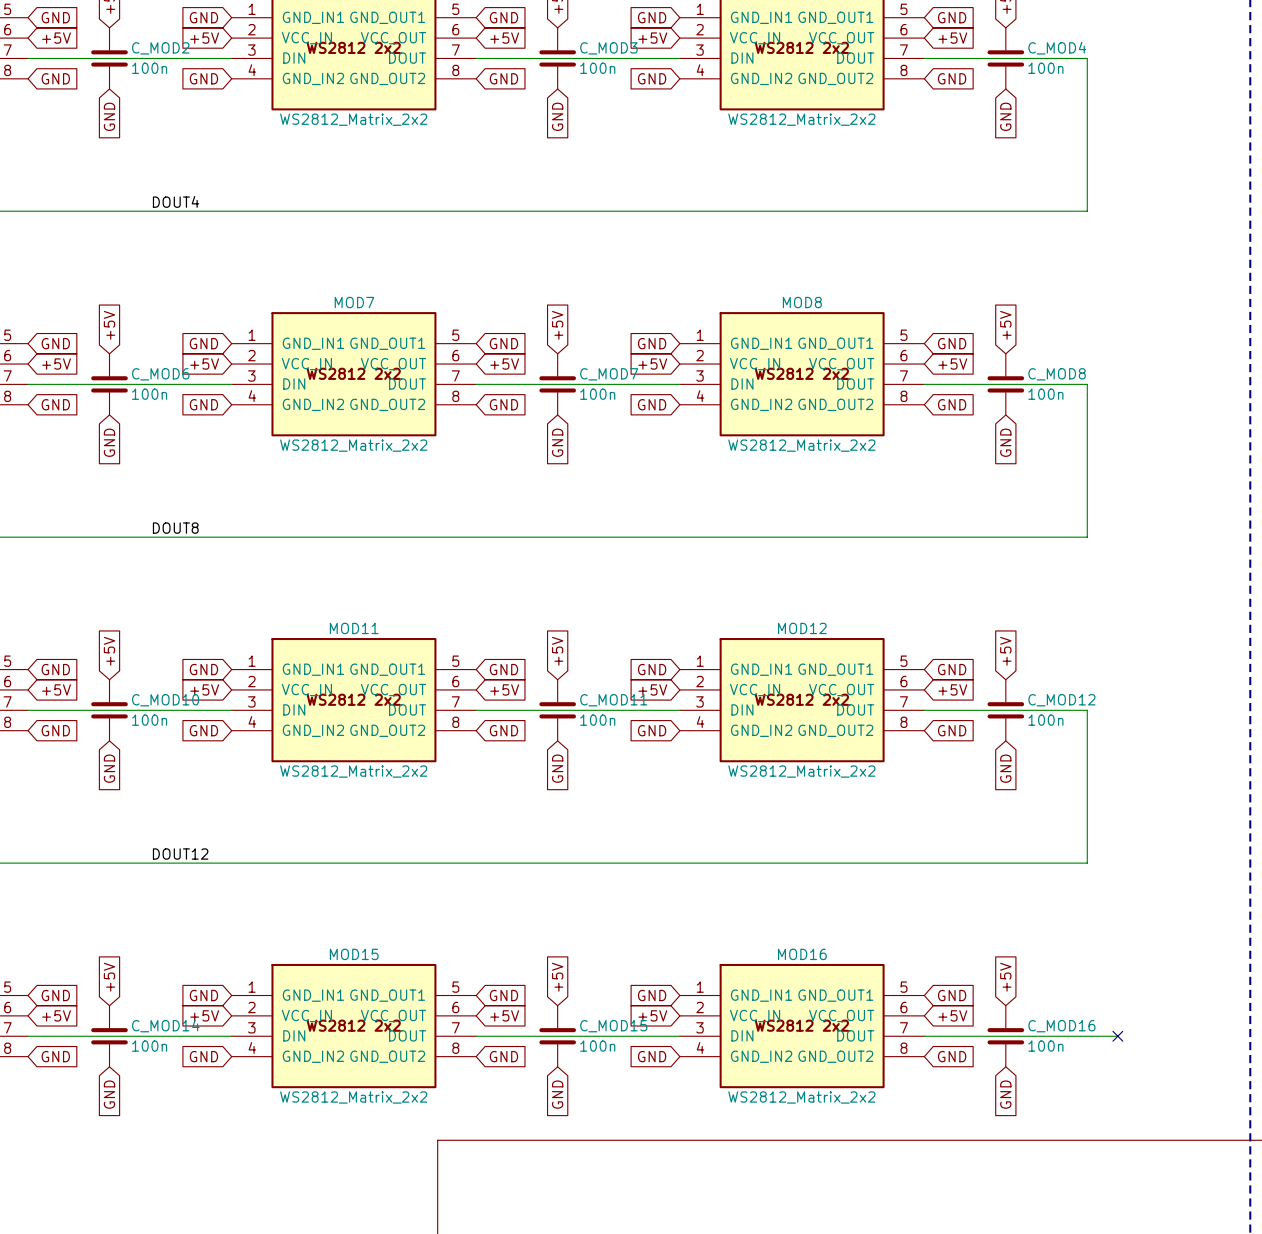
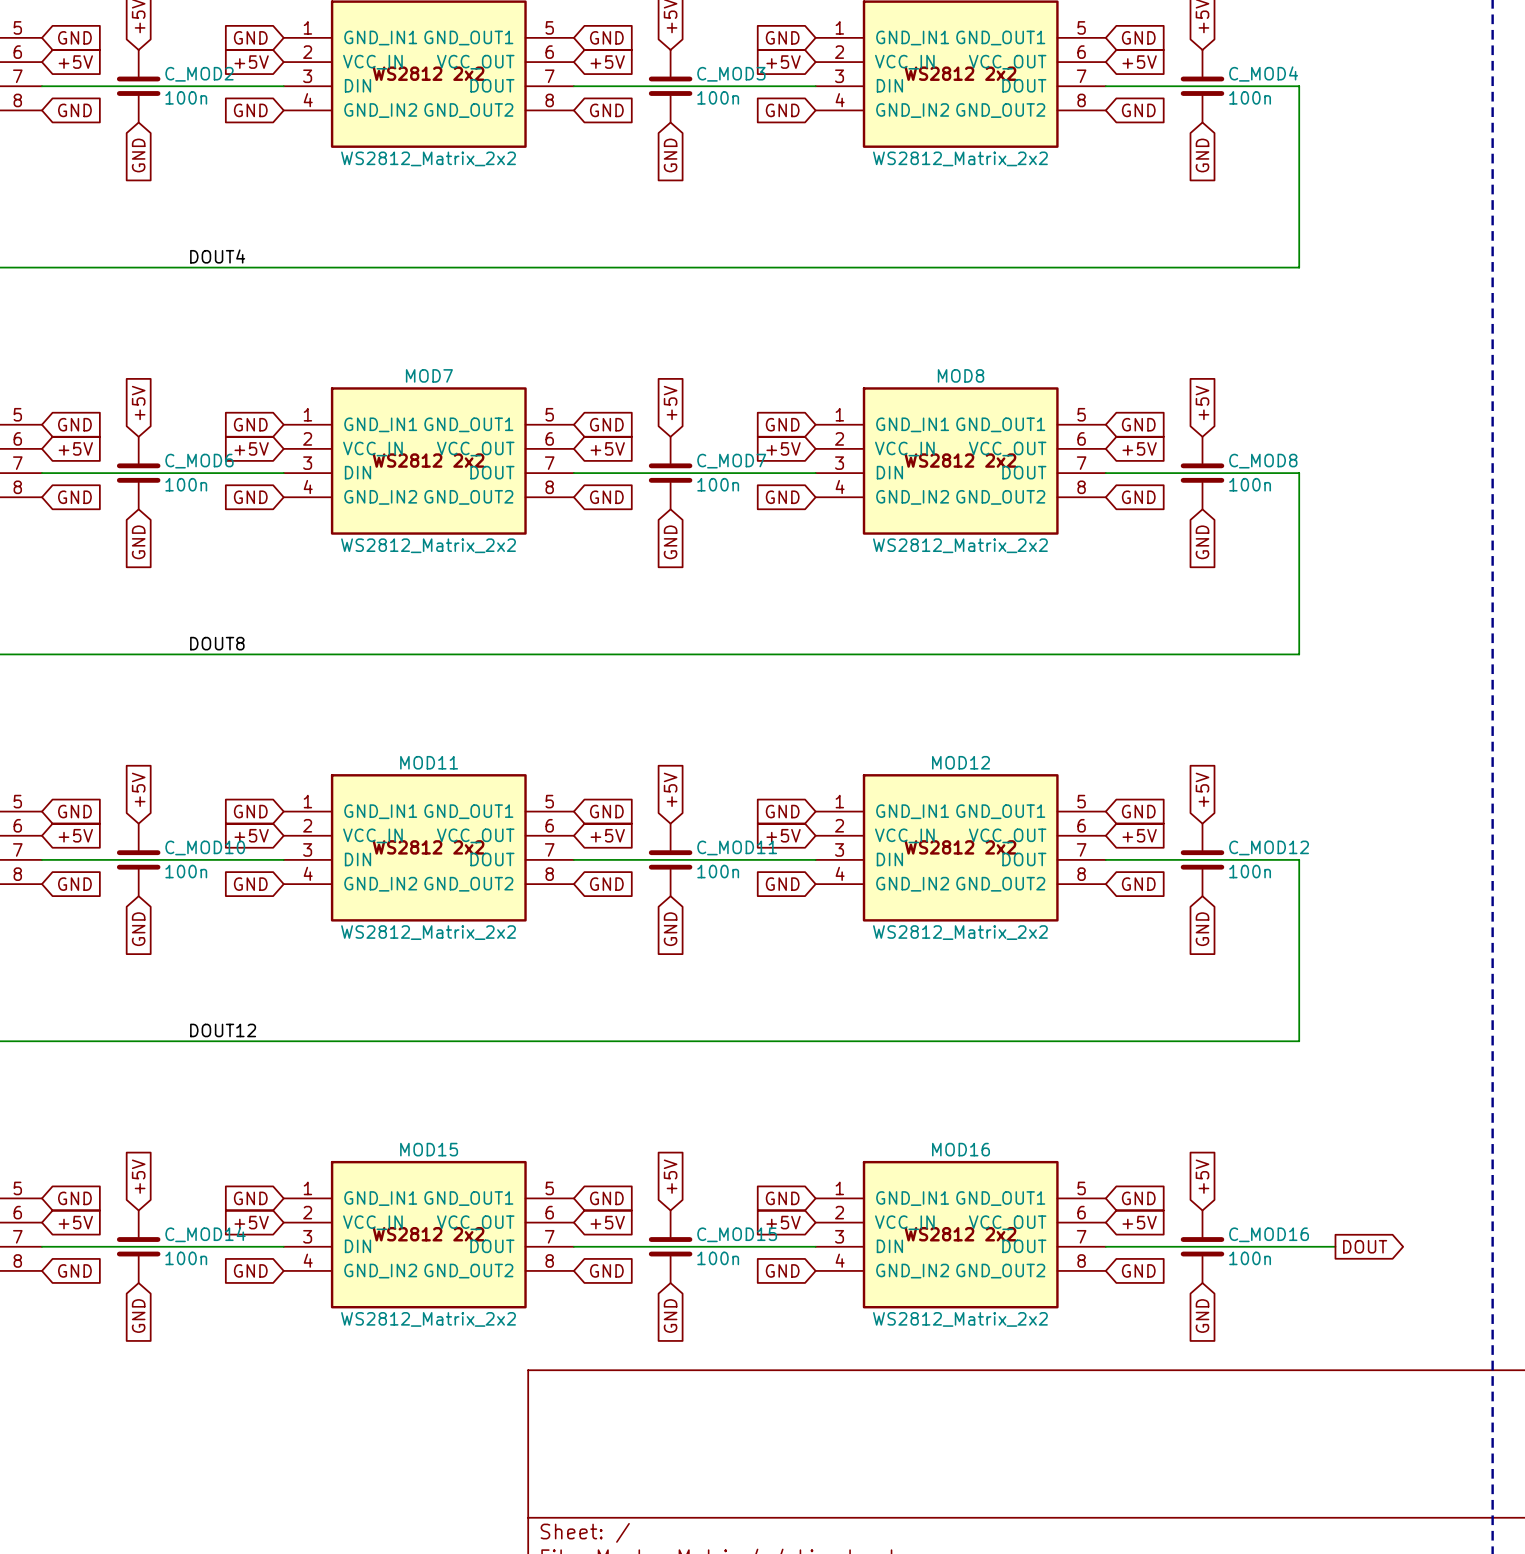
no-connect mark: (1117, 1036) -> none
global label: none -> DOUT (1365, 1246)

